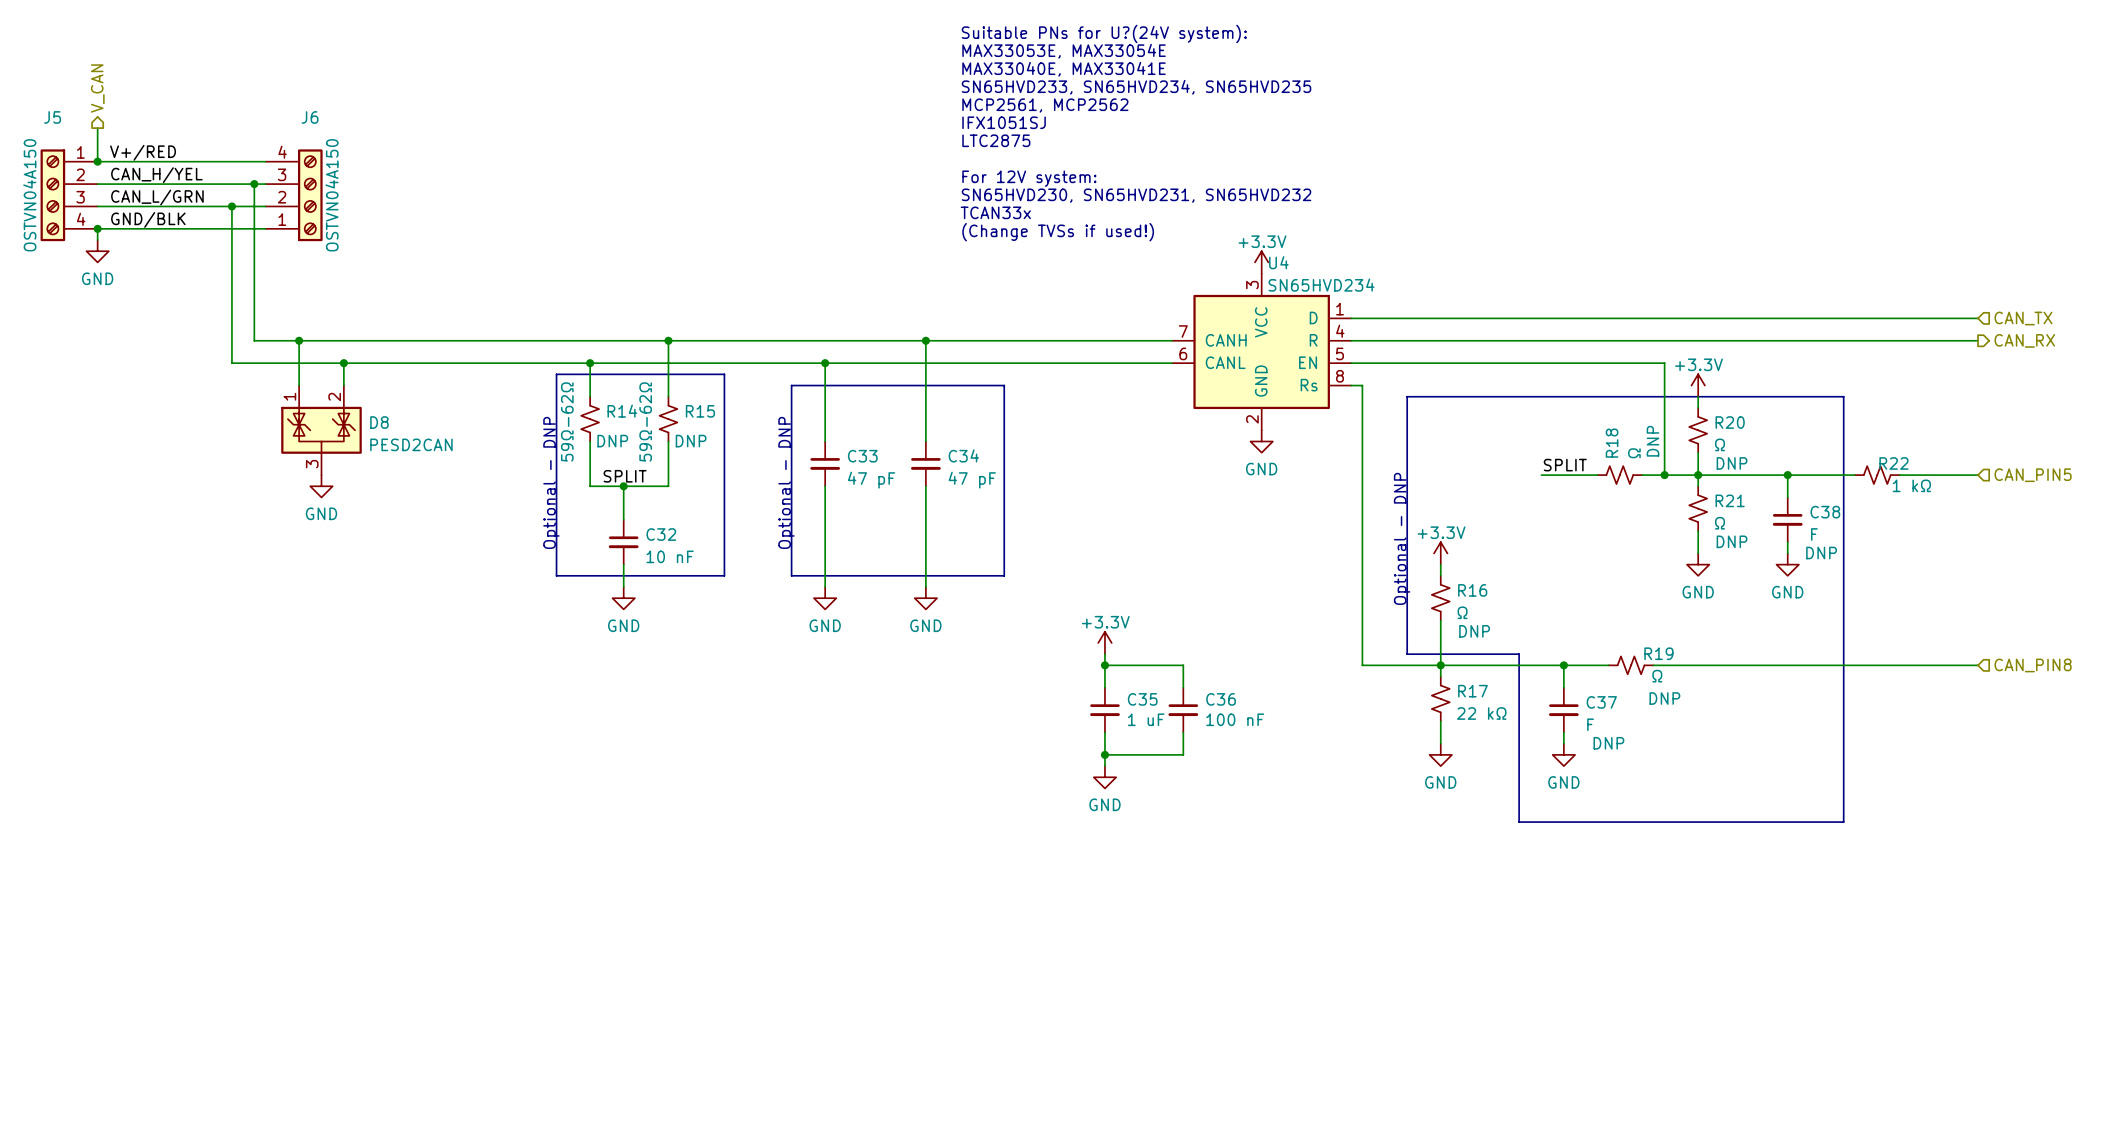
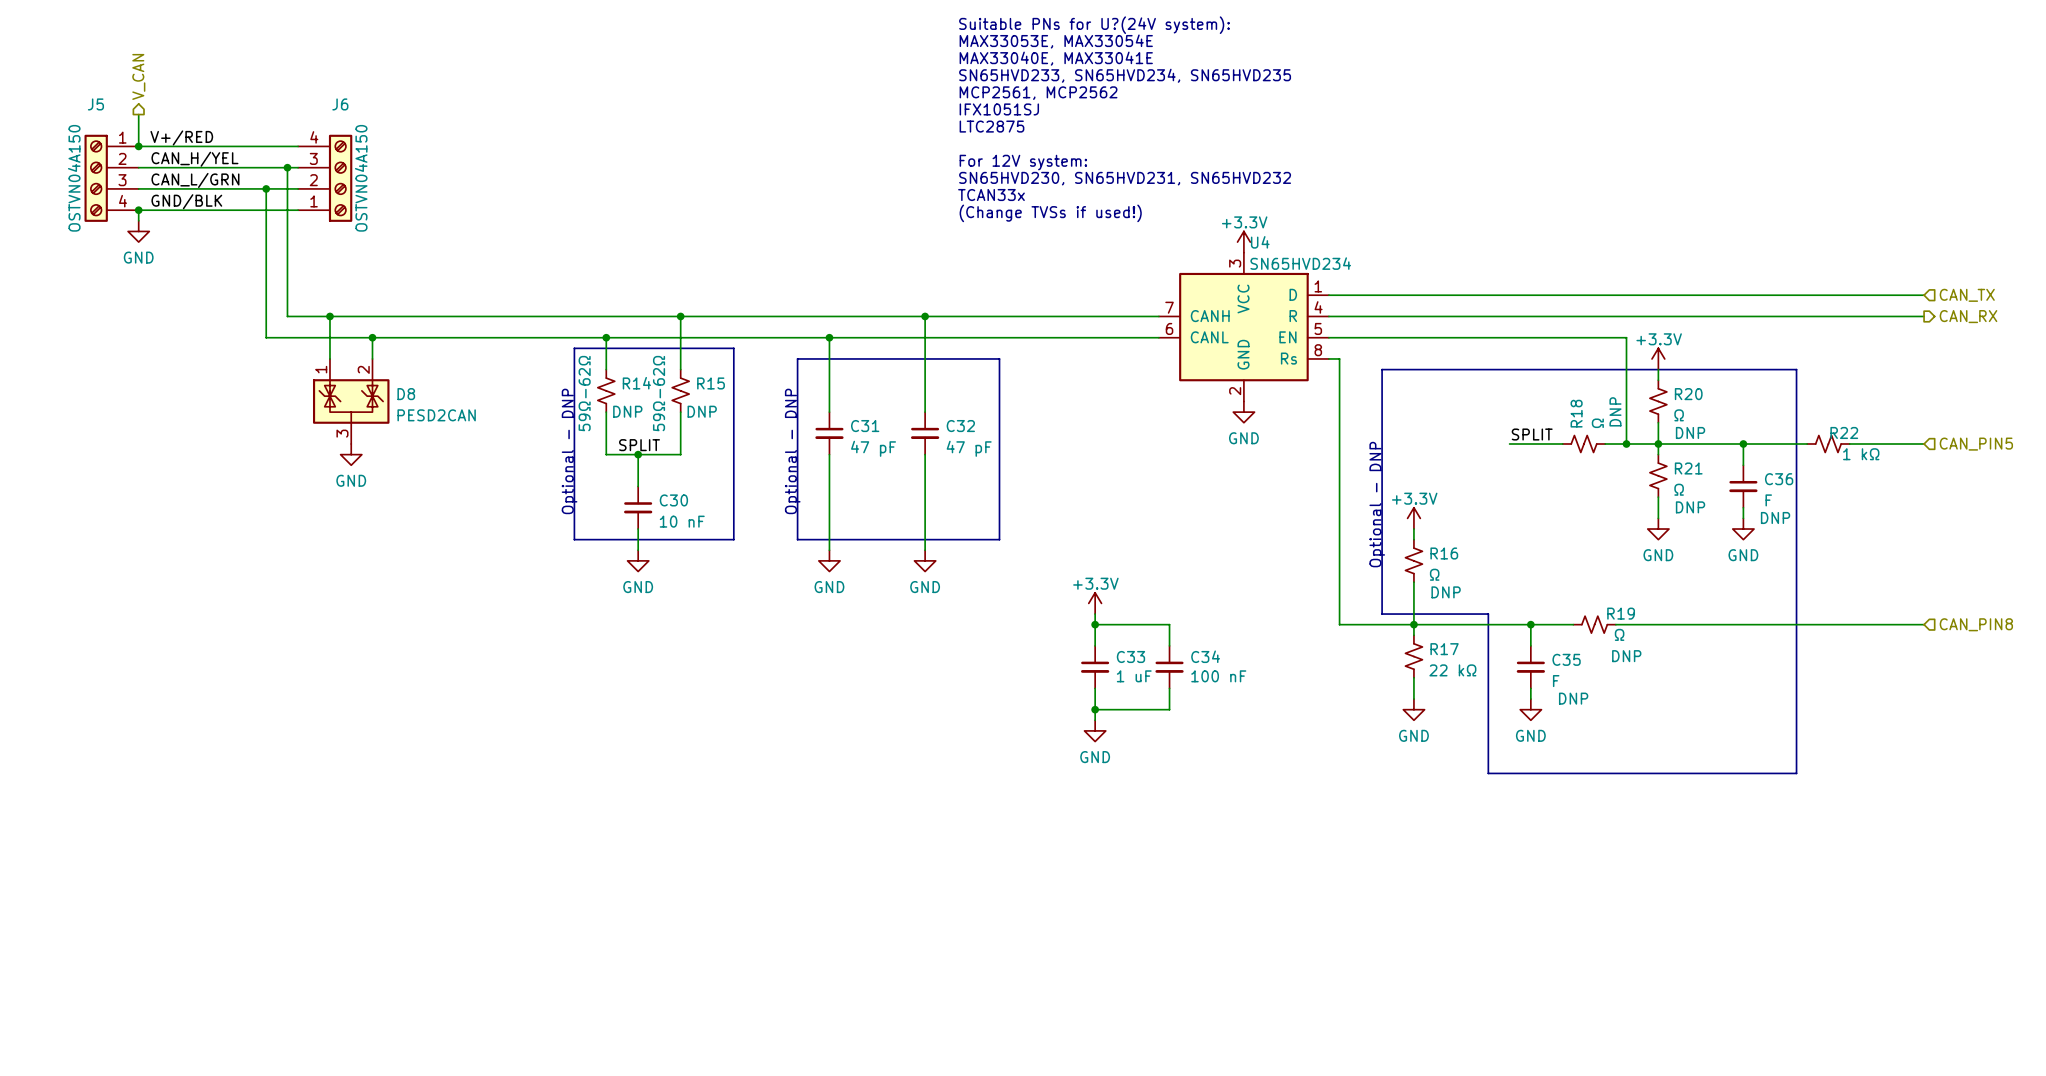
C34 name: C34 (963, 455) -> C32 (960, 426)
C33 name: C33 (862, 456) -> C31 (865, 426)
C38 name: C38 (1825, 512) -> C36 (1779, 479)
C32 name: C32 (661, 534) -> C30 (673, 500)
C35 name: C35 (1142, 699) -> C33 (1130, 656)
C36 name: C36 (1221, 699) -> C34 (1205, 656)
C37 name: C37 (1601, 702) -> C35 (1566, 659)

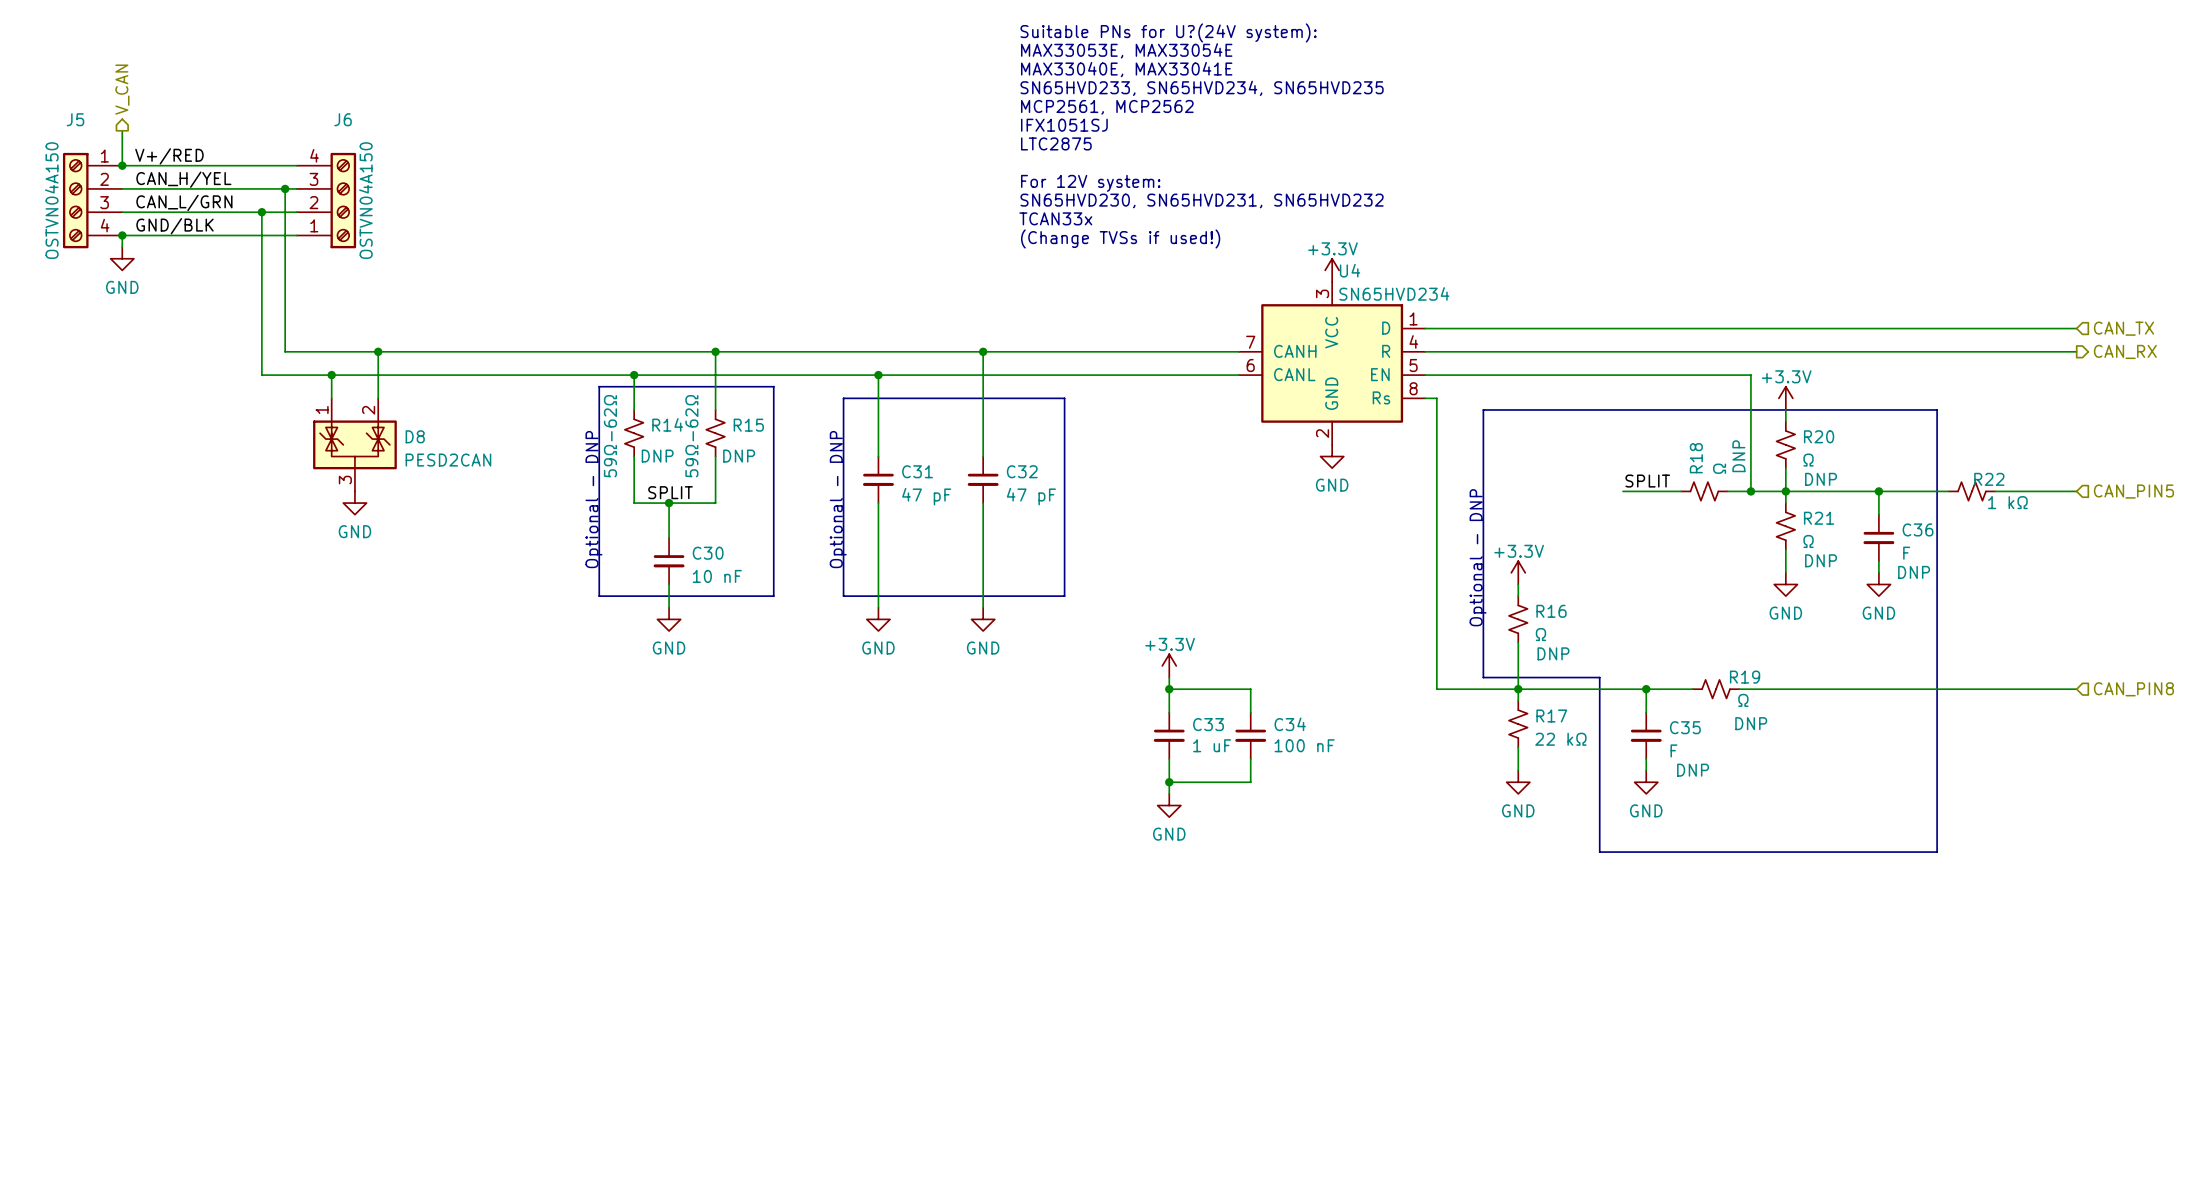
wire: (329, 316) (329, 337) -> (378, 351) (378, 375)
junction: (329, 316) -> none
junction: none -> (378, 351)
junction: none -> (331, 375)
junction: (372, 337) -> none

